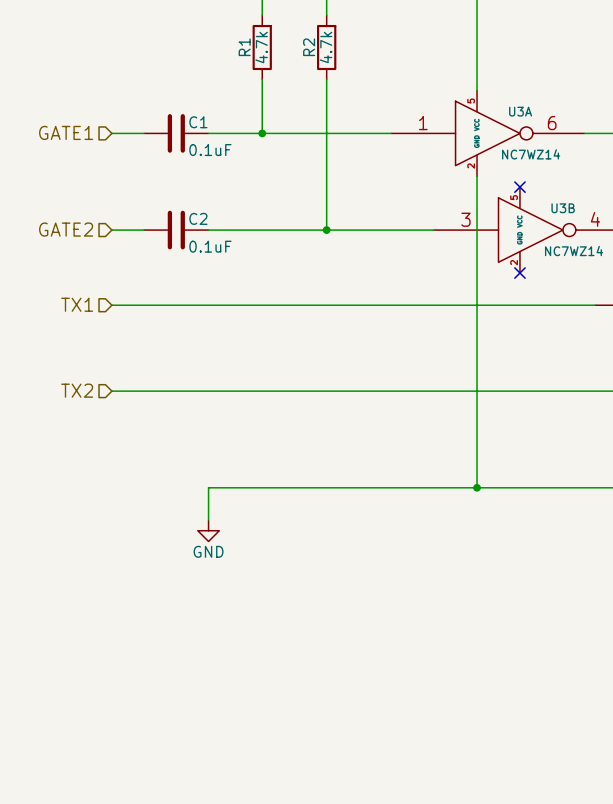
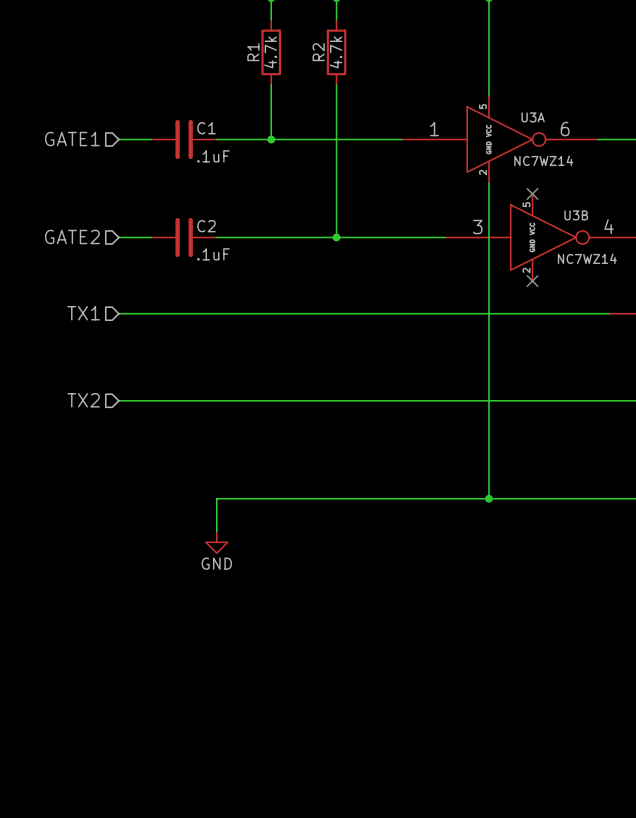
C1 value: 0.1uF (210, 150) -> .1uF (213, 156)
C2 value: 0.1uF (210, 246) -> .1uF (213, 254)

